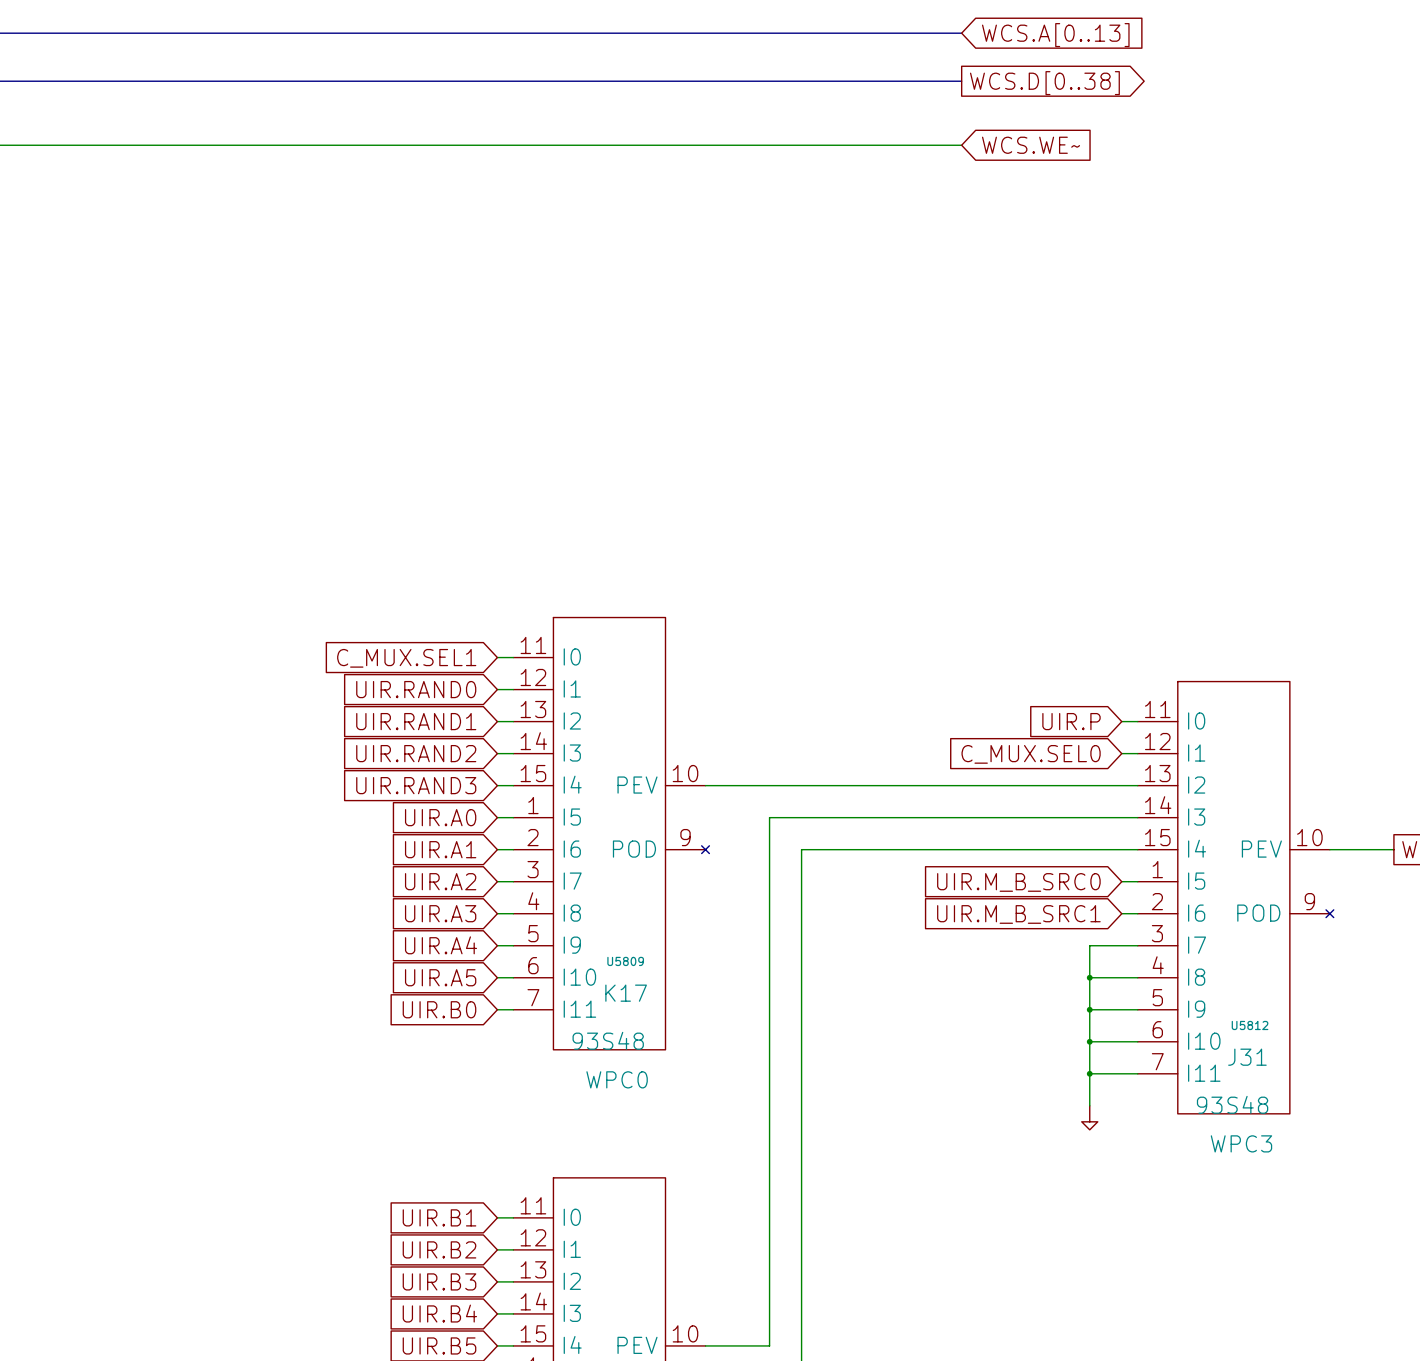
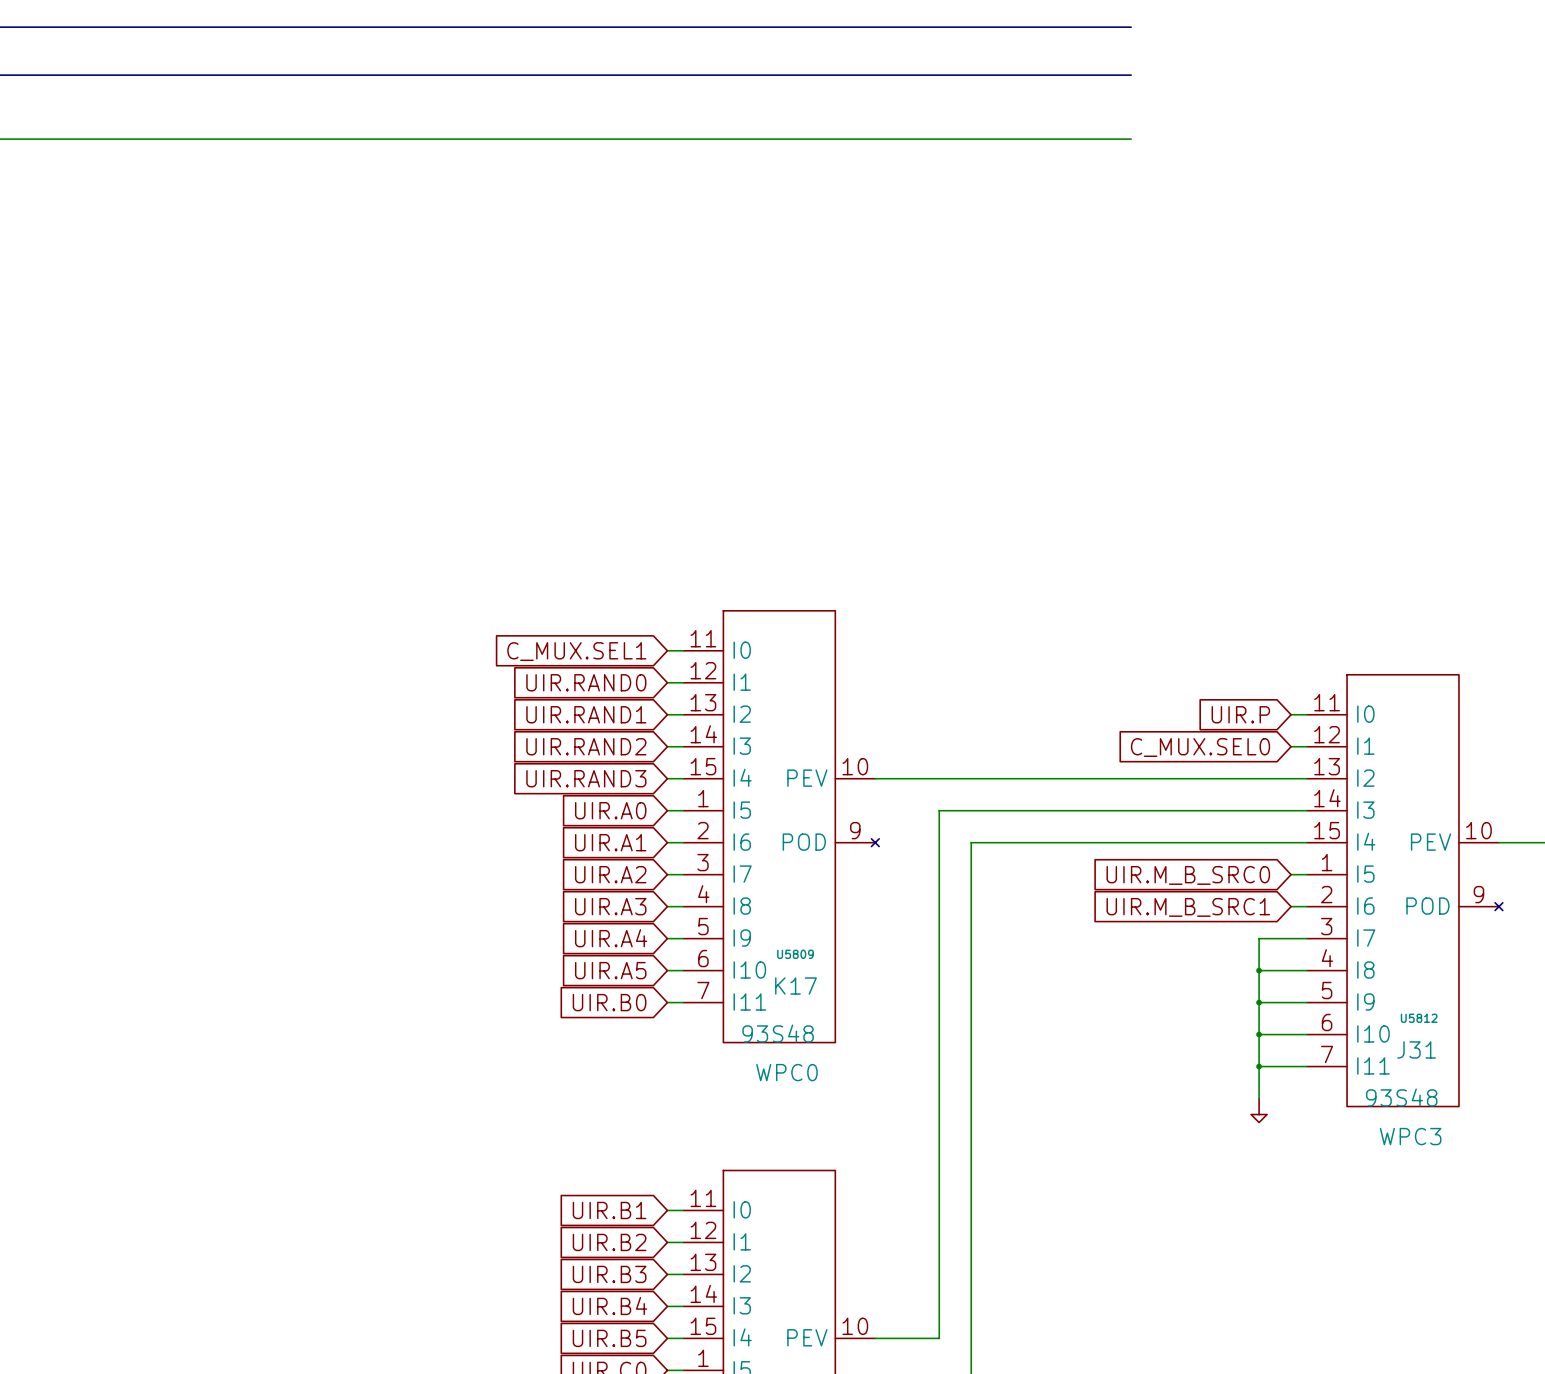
global label: WCS.A[0..13] (1055, 35) -> none
global label: WCS.D[0..38] (1044, 83) -> none
global label: WCS.WE~ (1031, 145) -> none

